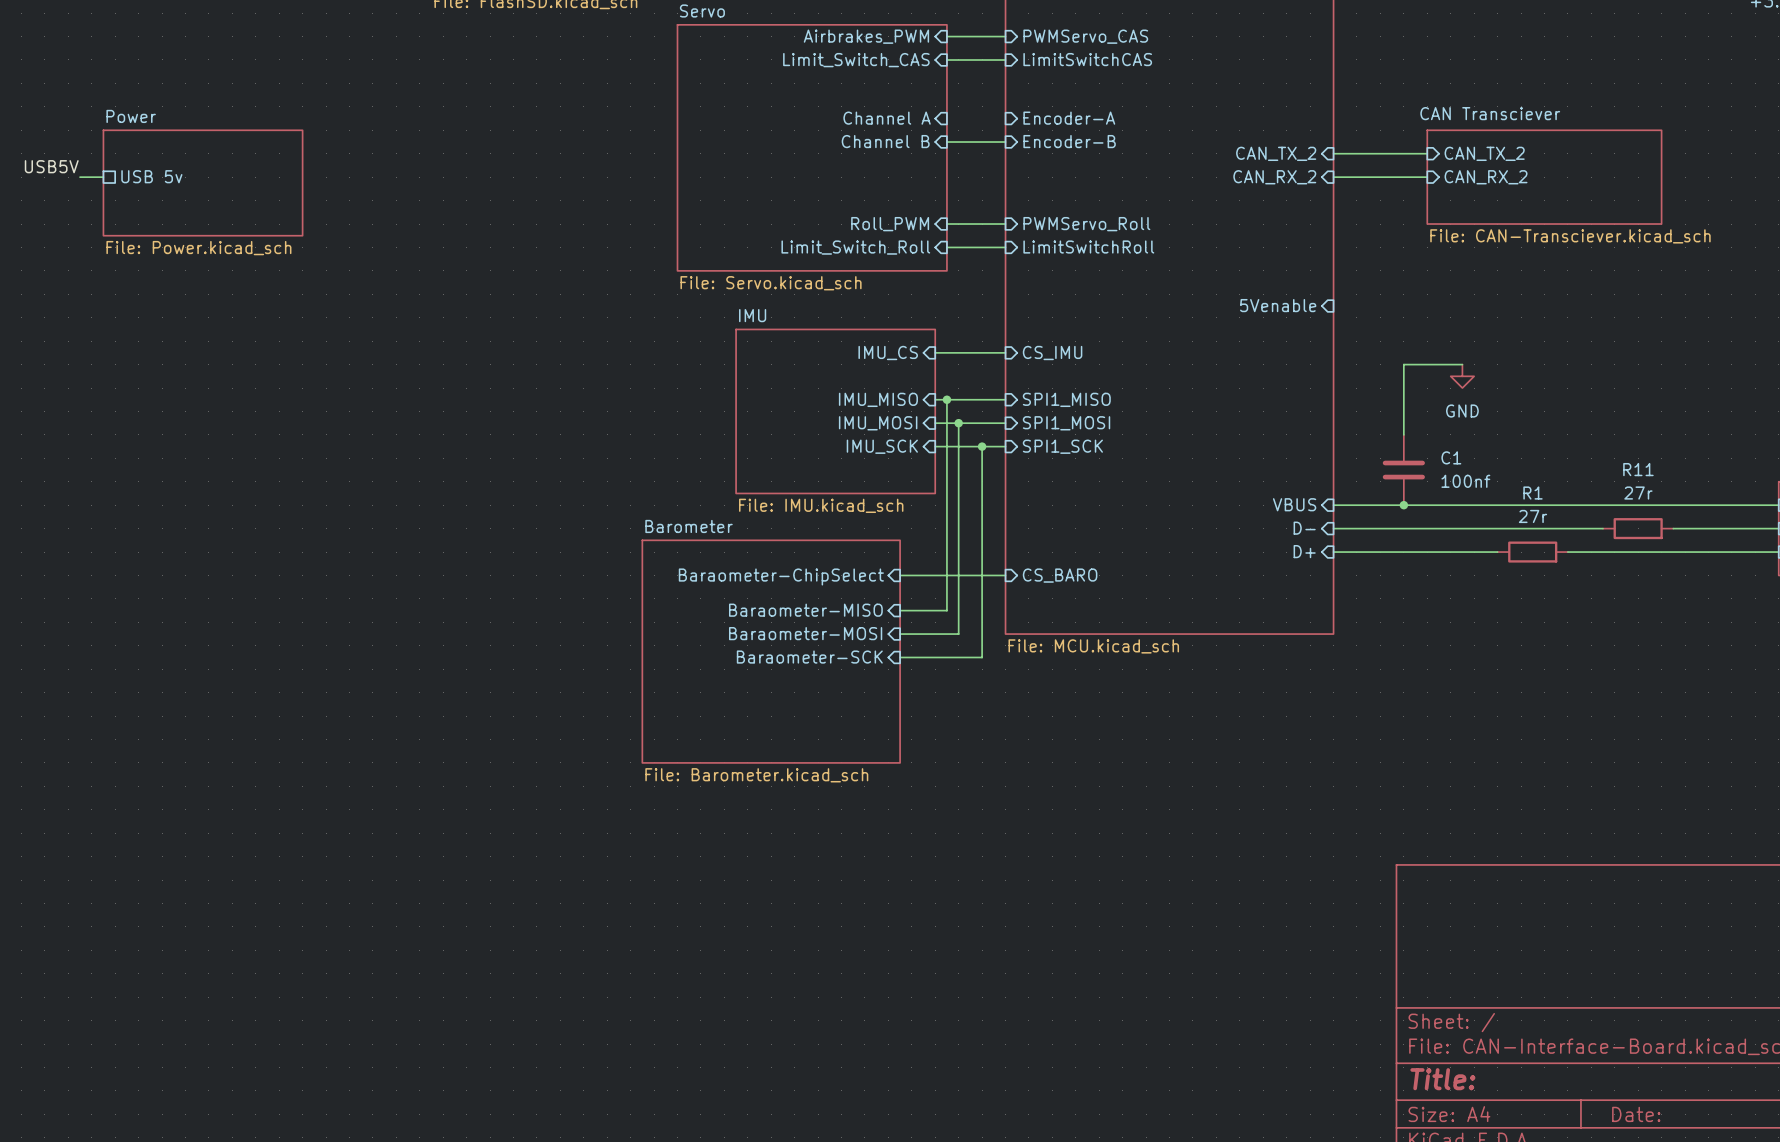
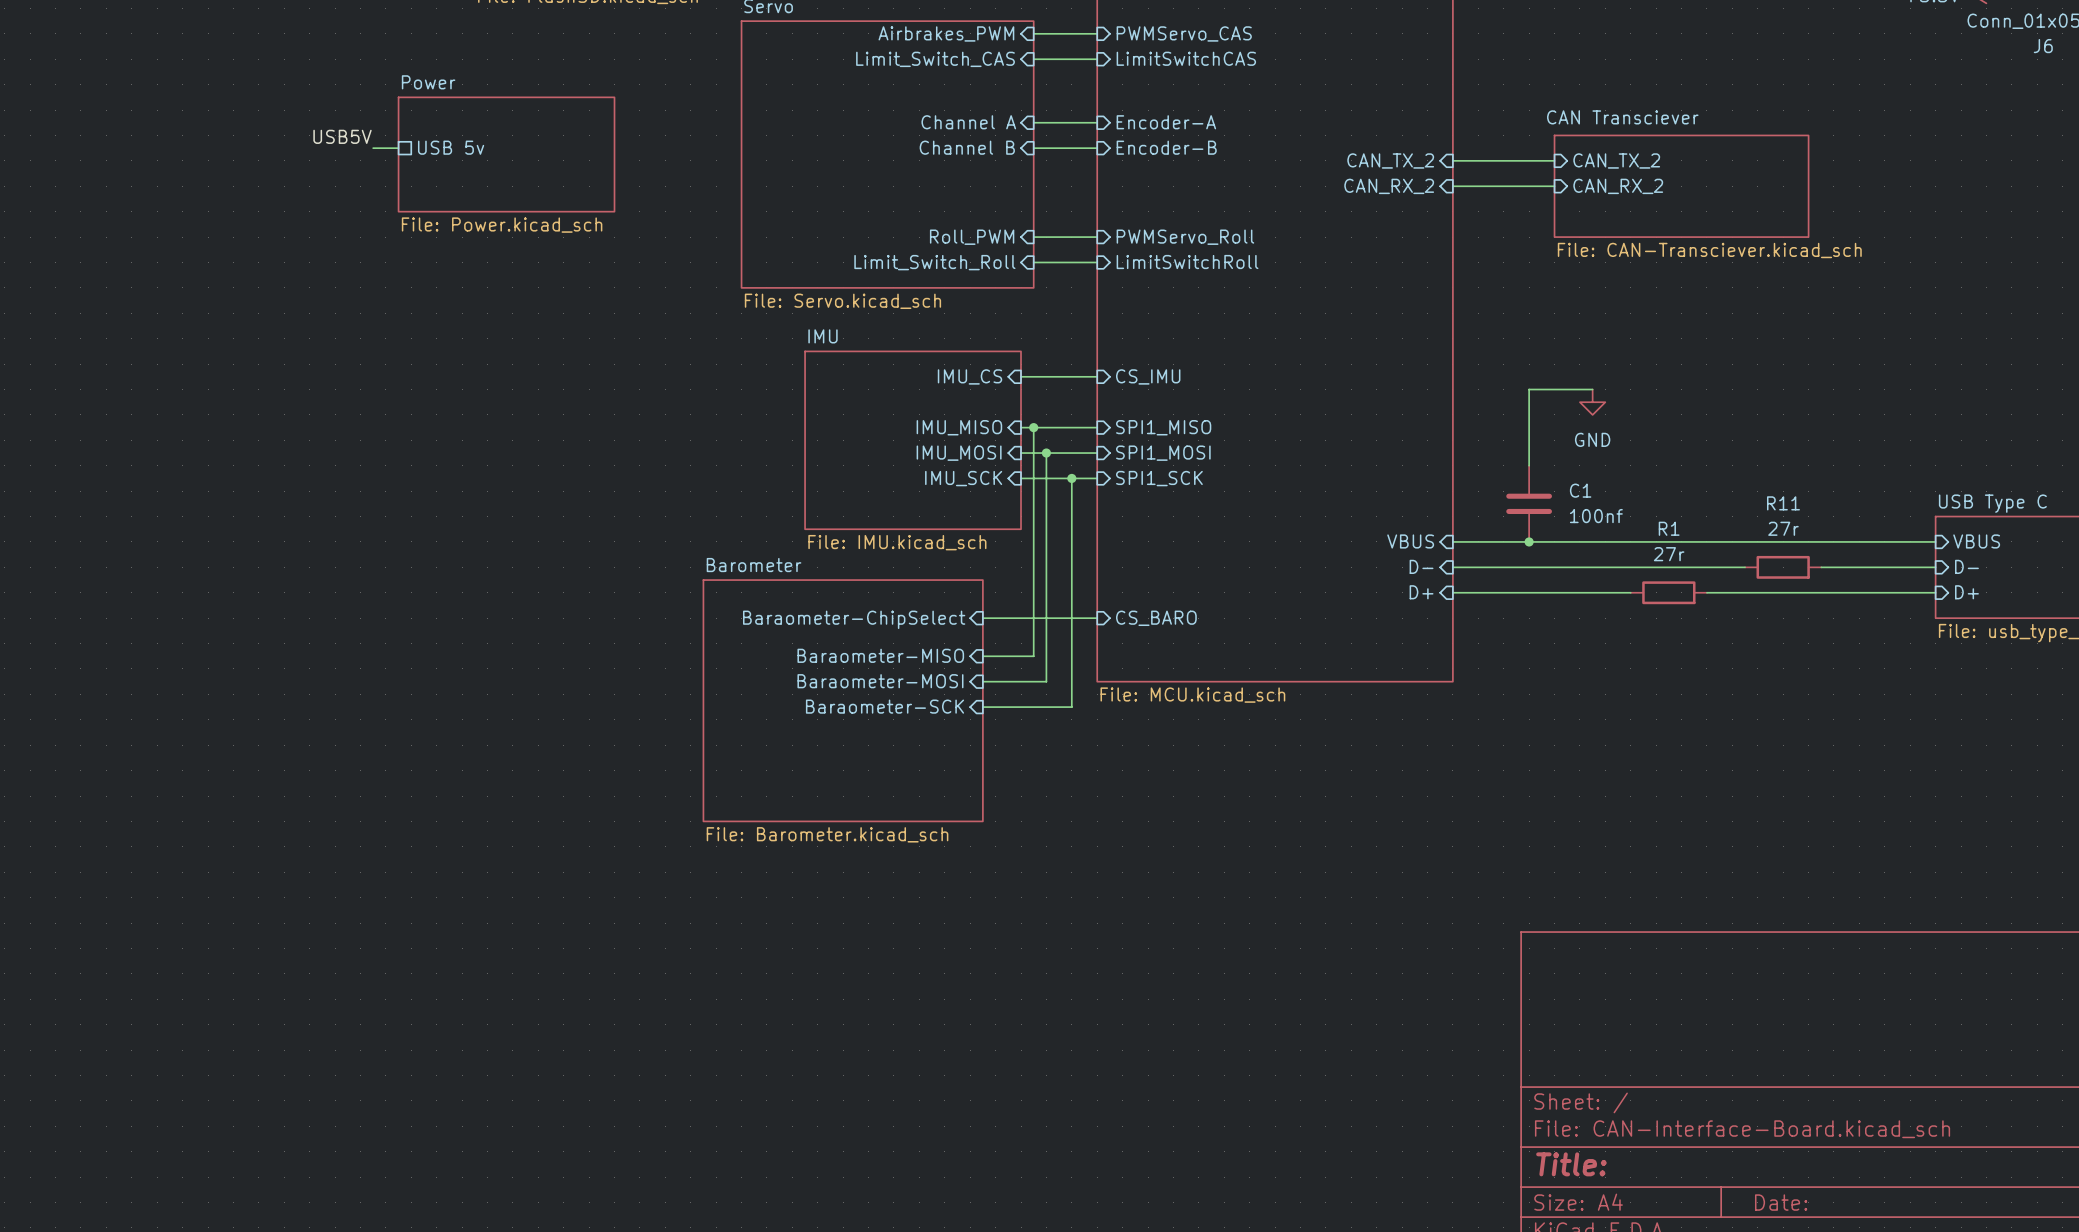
wire: none -> (1033, 122) (1097, 122)
label: none -> USB5V (342, 136)
sheet pin: none -> USB 5v (451, 147)
wire: none -> (373, 148) (398, 148)
sheet Power: none -> File: Power.kicad_sch (506, 154)
label: USB5V (51, 166) -> none
sheet pin: USB 5v (151, 176) -> none
wire: (80, 177) (103, 177) -> none
sheet Power: File: Power.kicad_sch (203, 183) -> none
sheet pin: 5Venable (1278, 305) -> none

